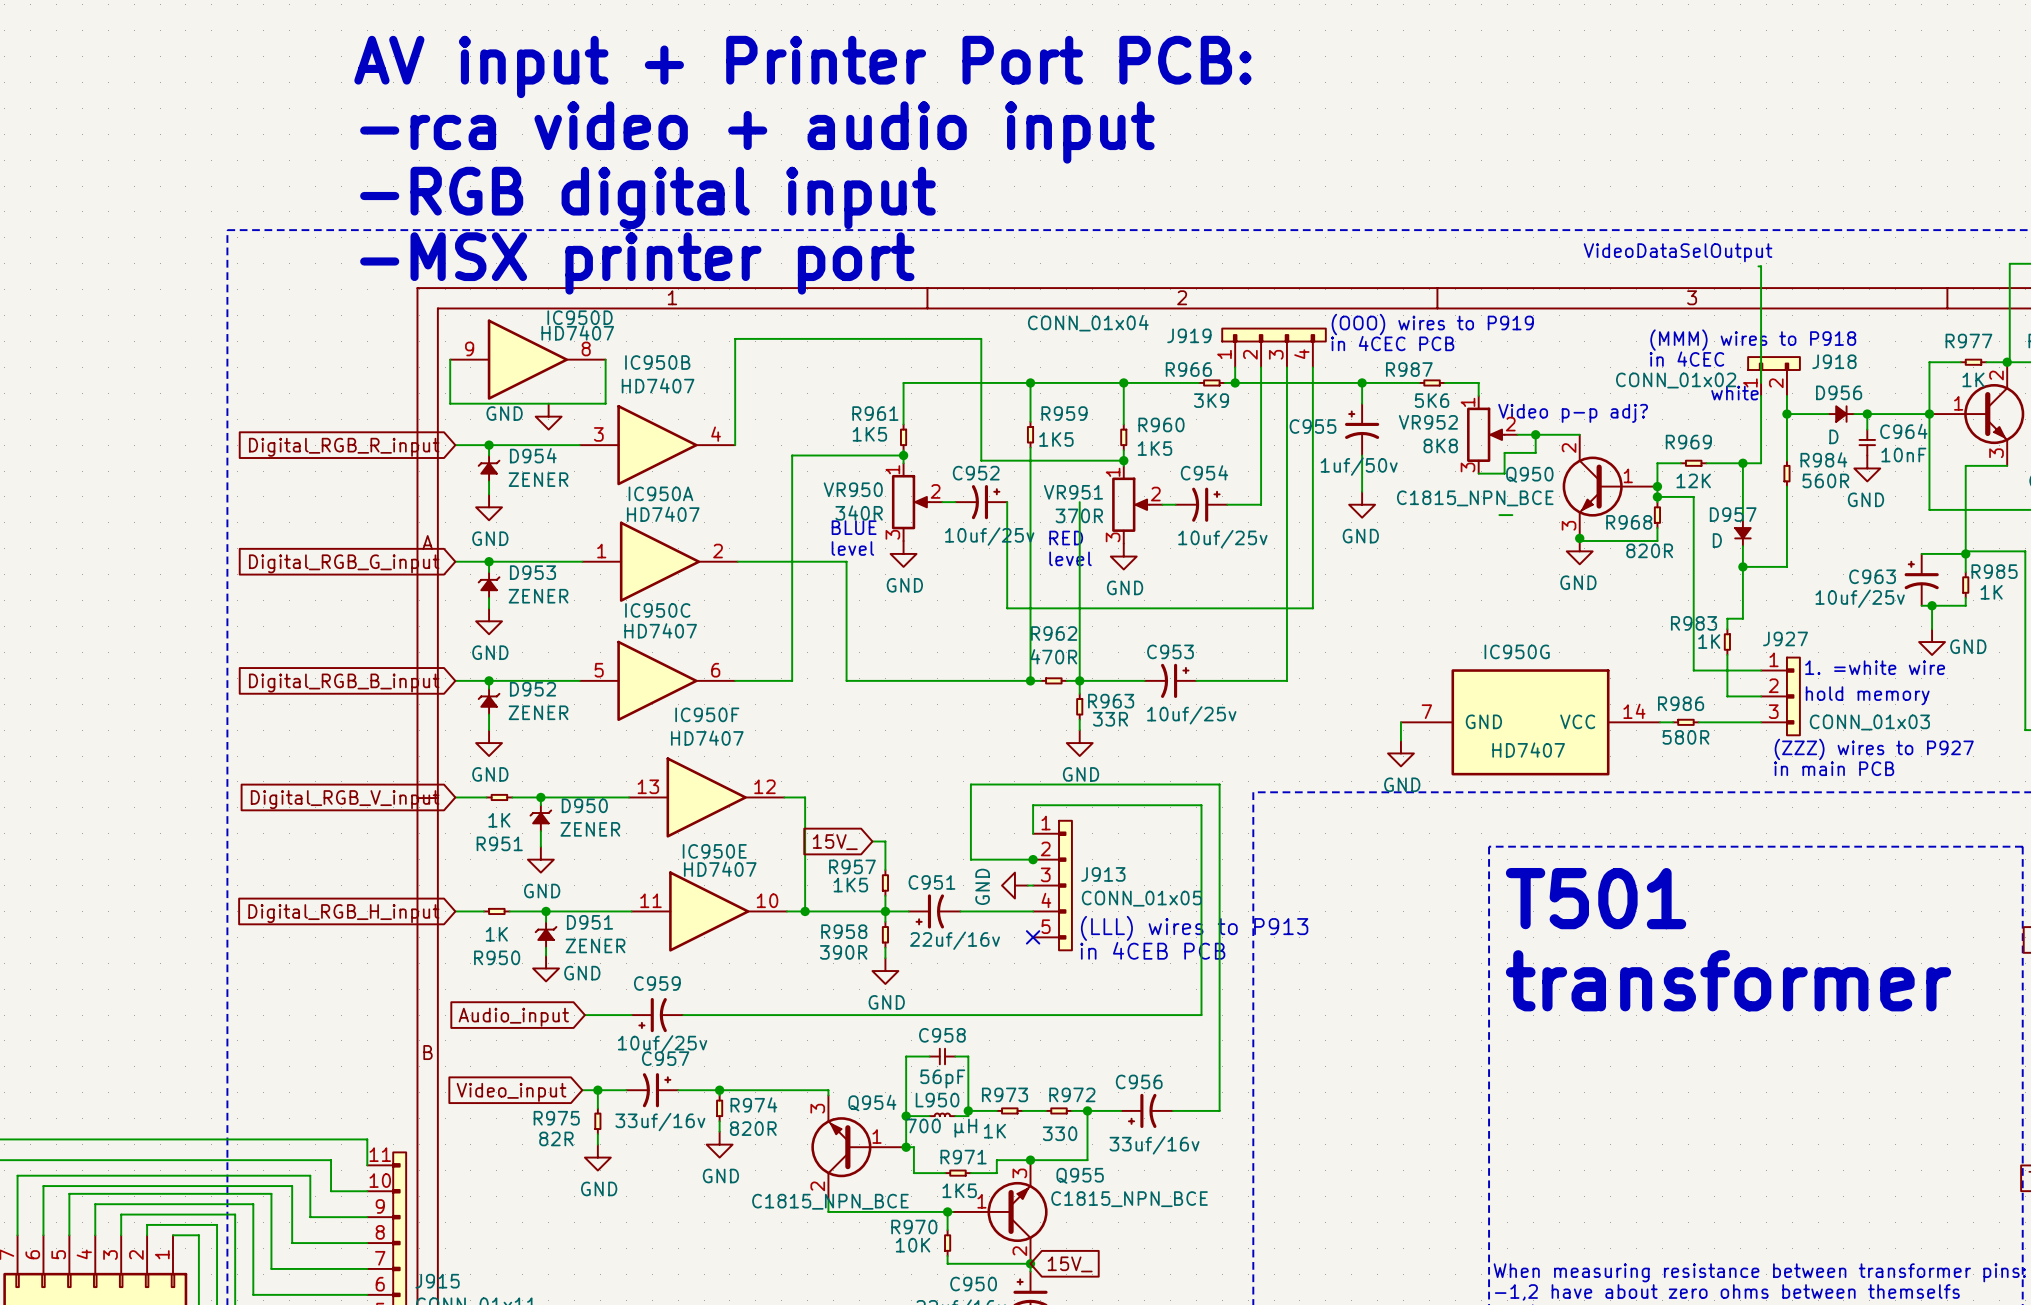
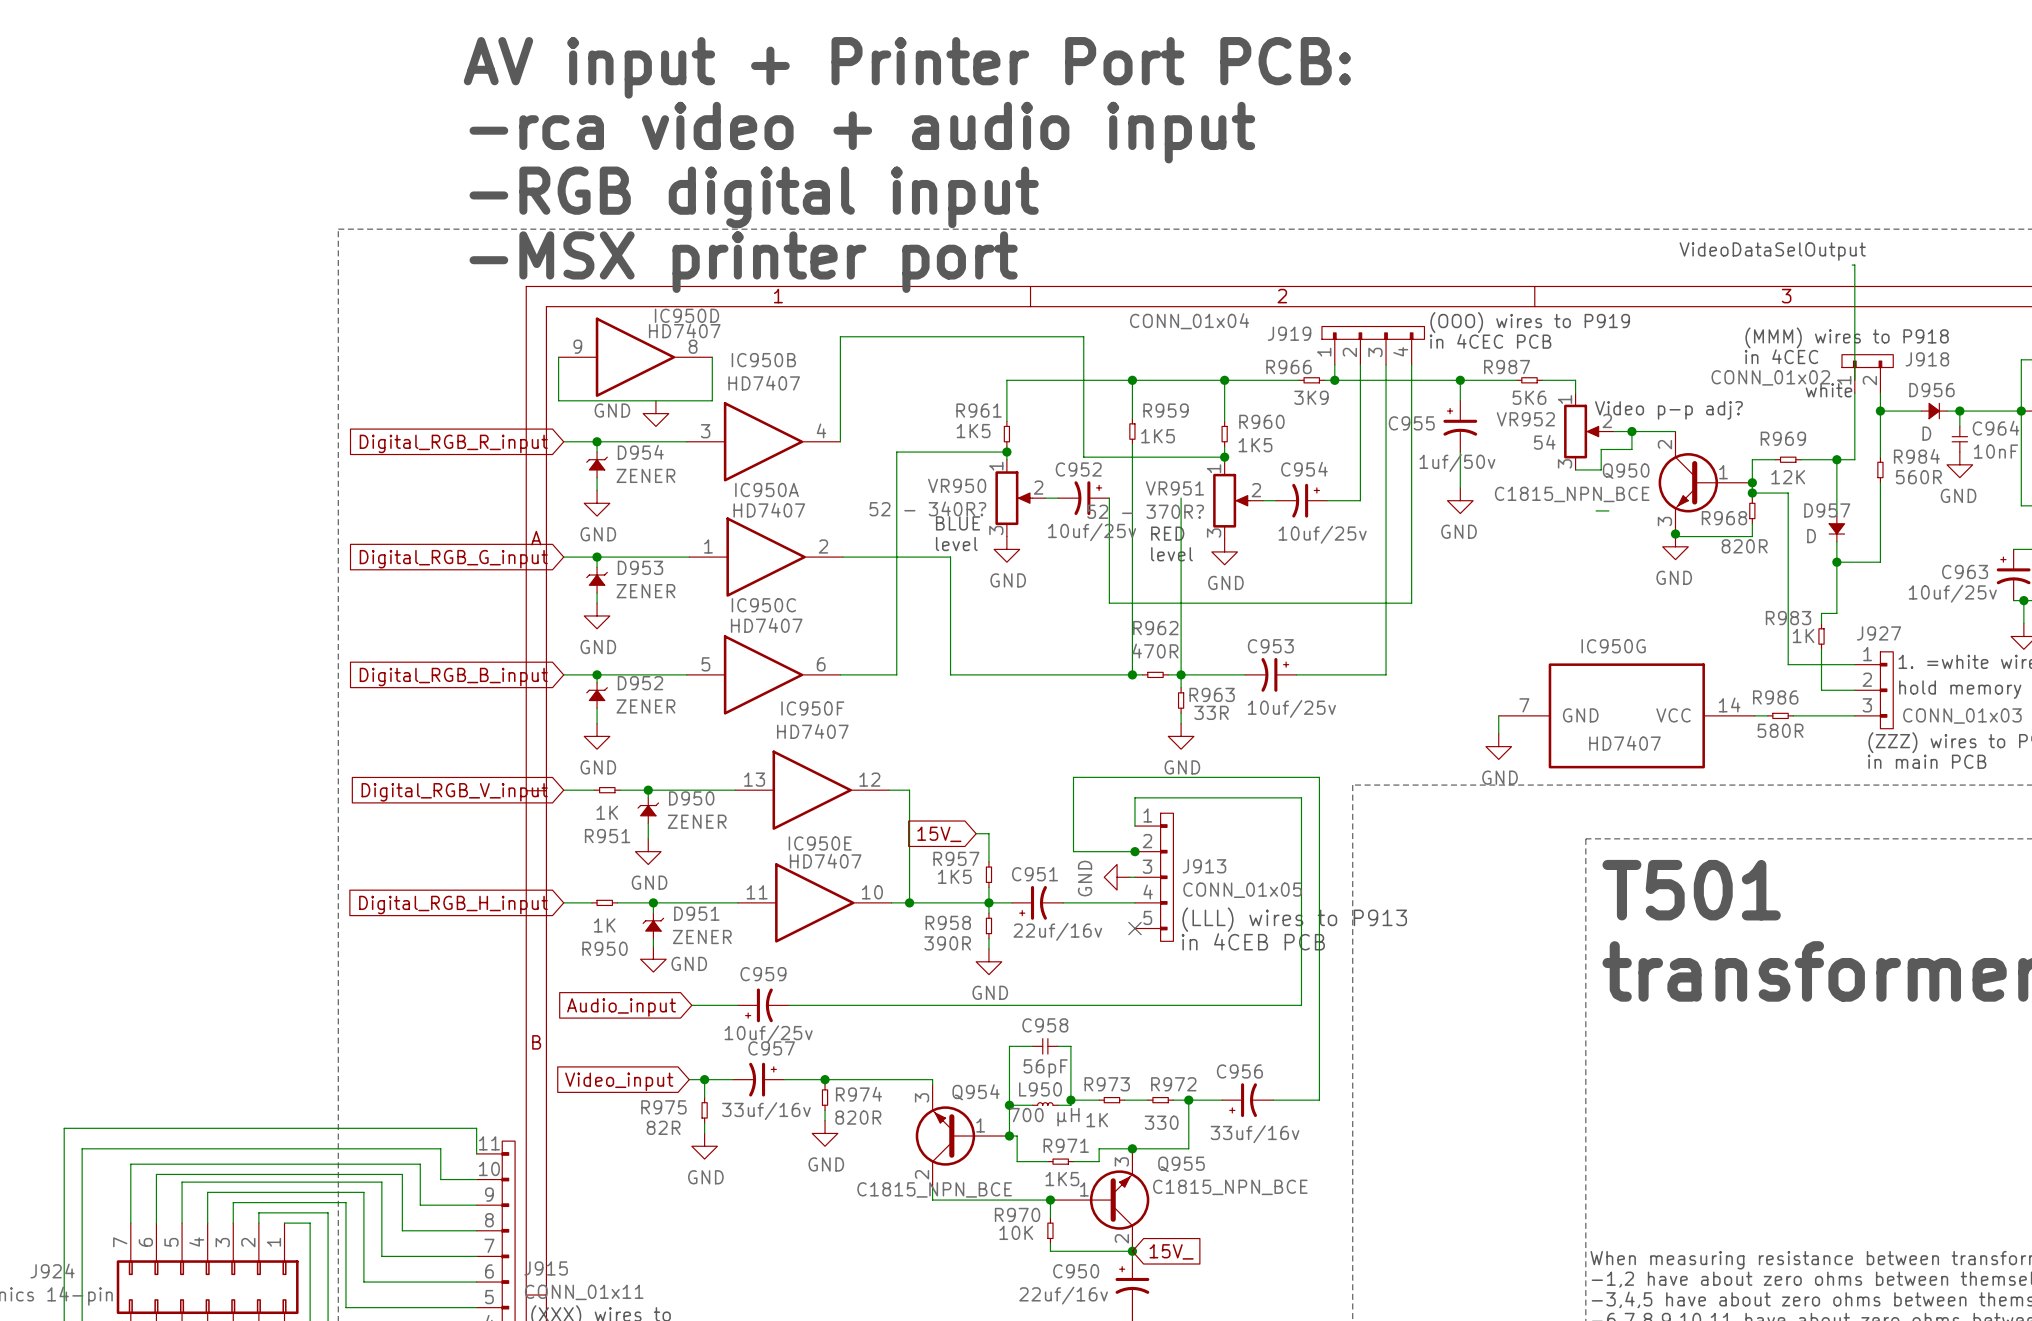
VR952 value: 8K8 (1440, 445) -> 54 (1544, 442)
VR950 value: 340R (859, 513) -> 52 - 340R? (927, 508)
VR951 value: 370R (1079, 515) -> 52 - 370R? (1145, 511)

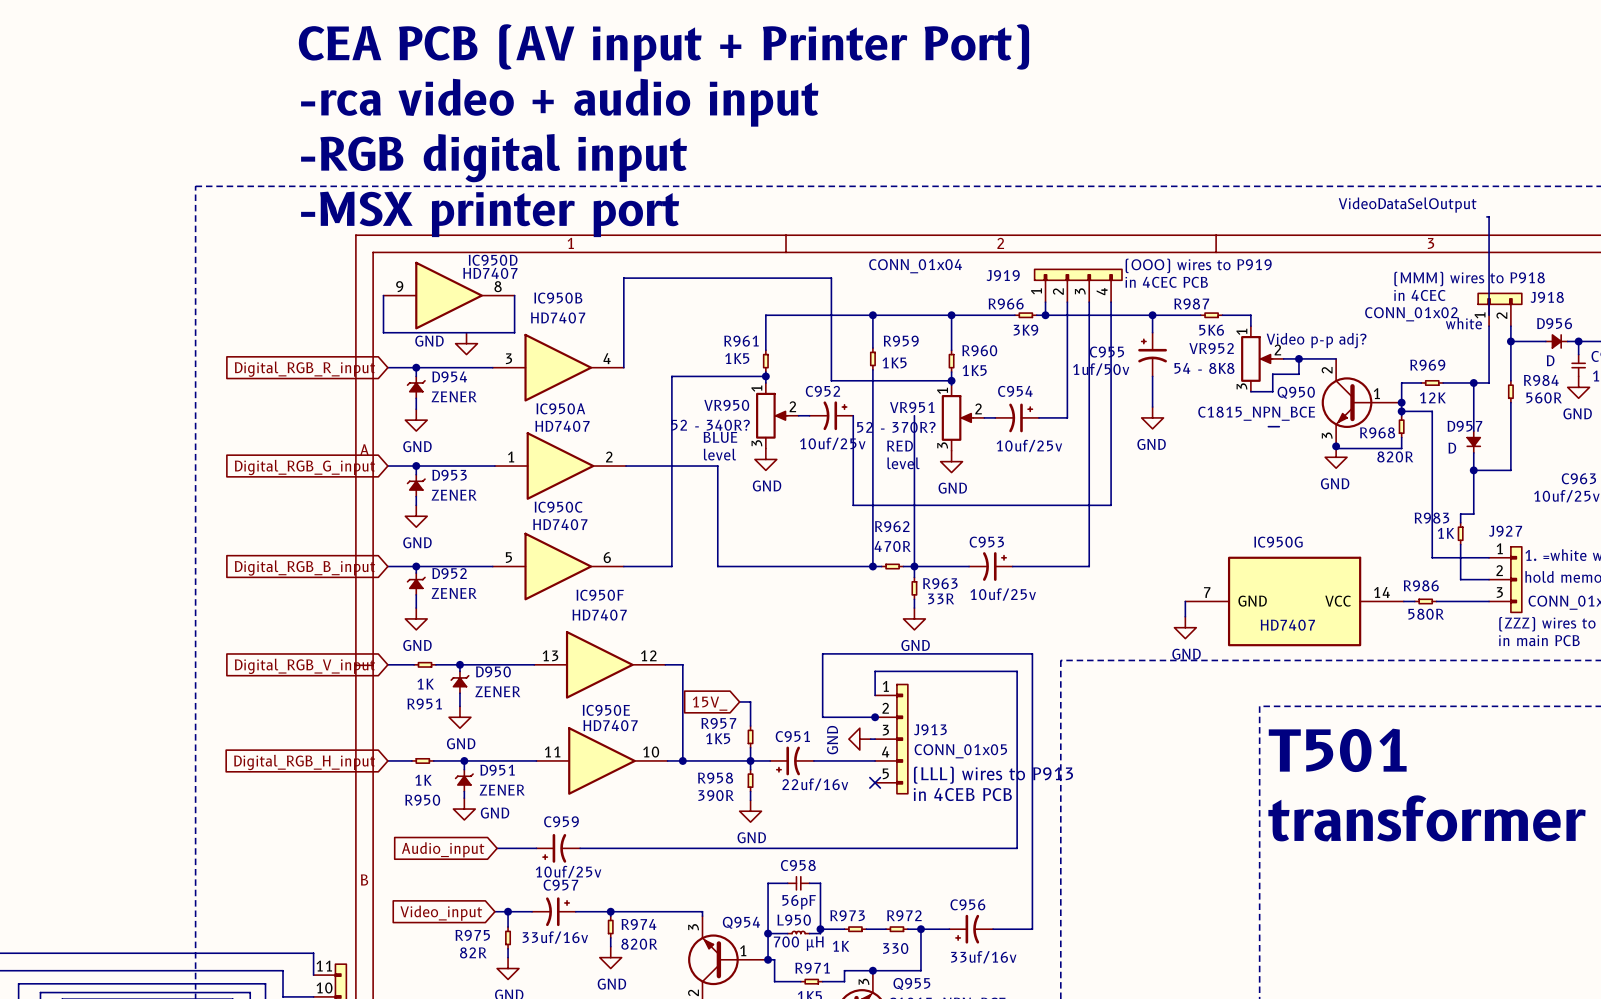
text: AV input + Printer Port PCB: (907, 67) -> CEA PCB (AV input + Printer Port) (663, 47)
VR952 value: 54 (1544, 442) -> 54 - 8K8 (1204, 368)
C955 value position: 1uf/50v (1457, 463) -> 1uf/50v (1101, 369)

